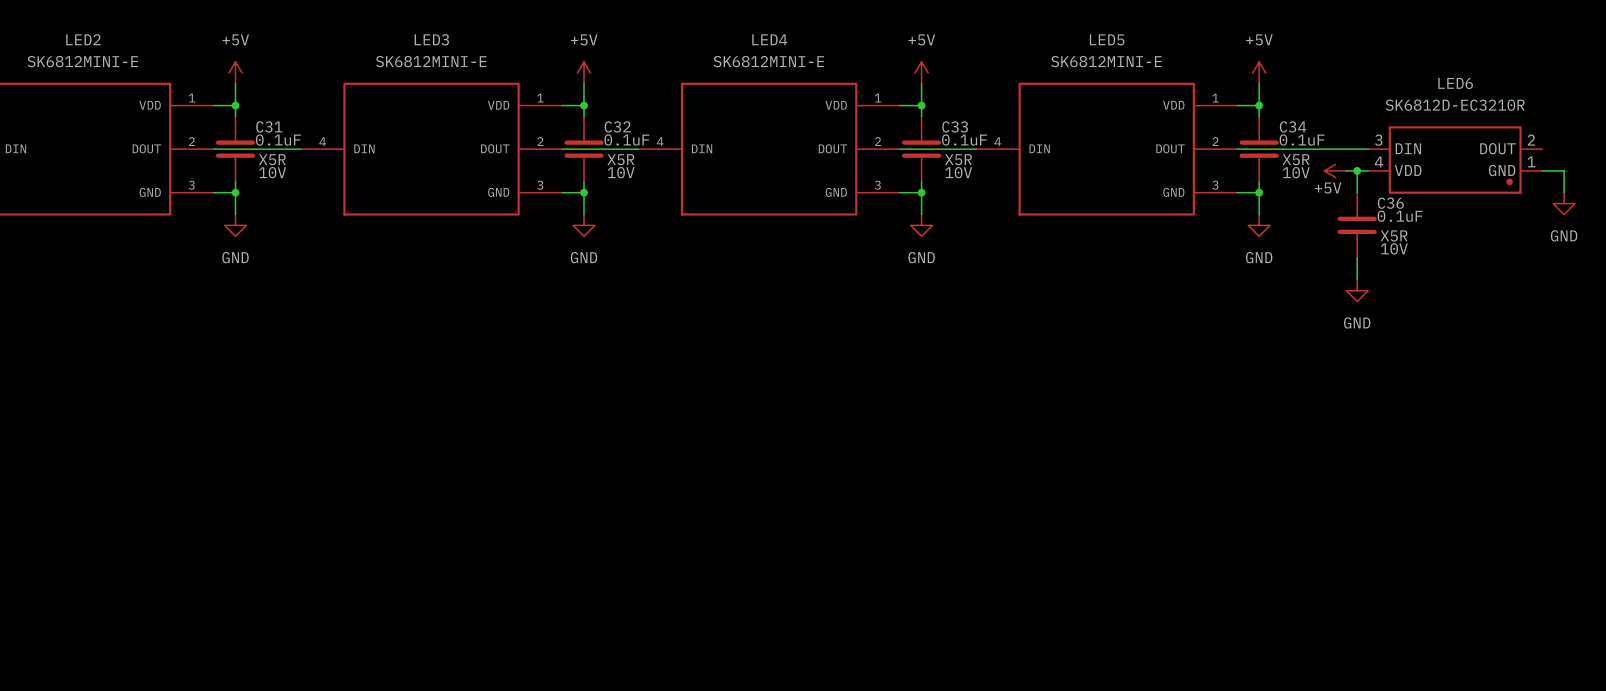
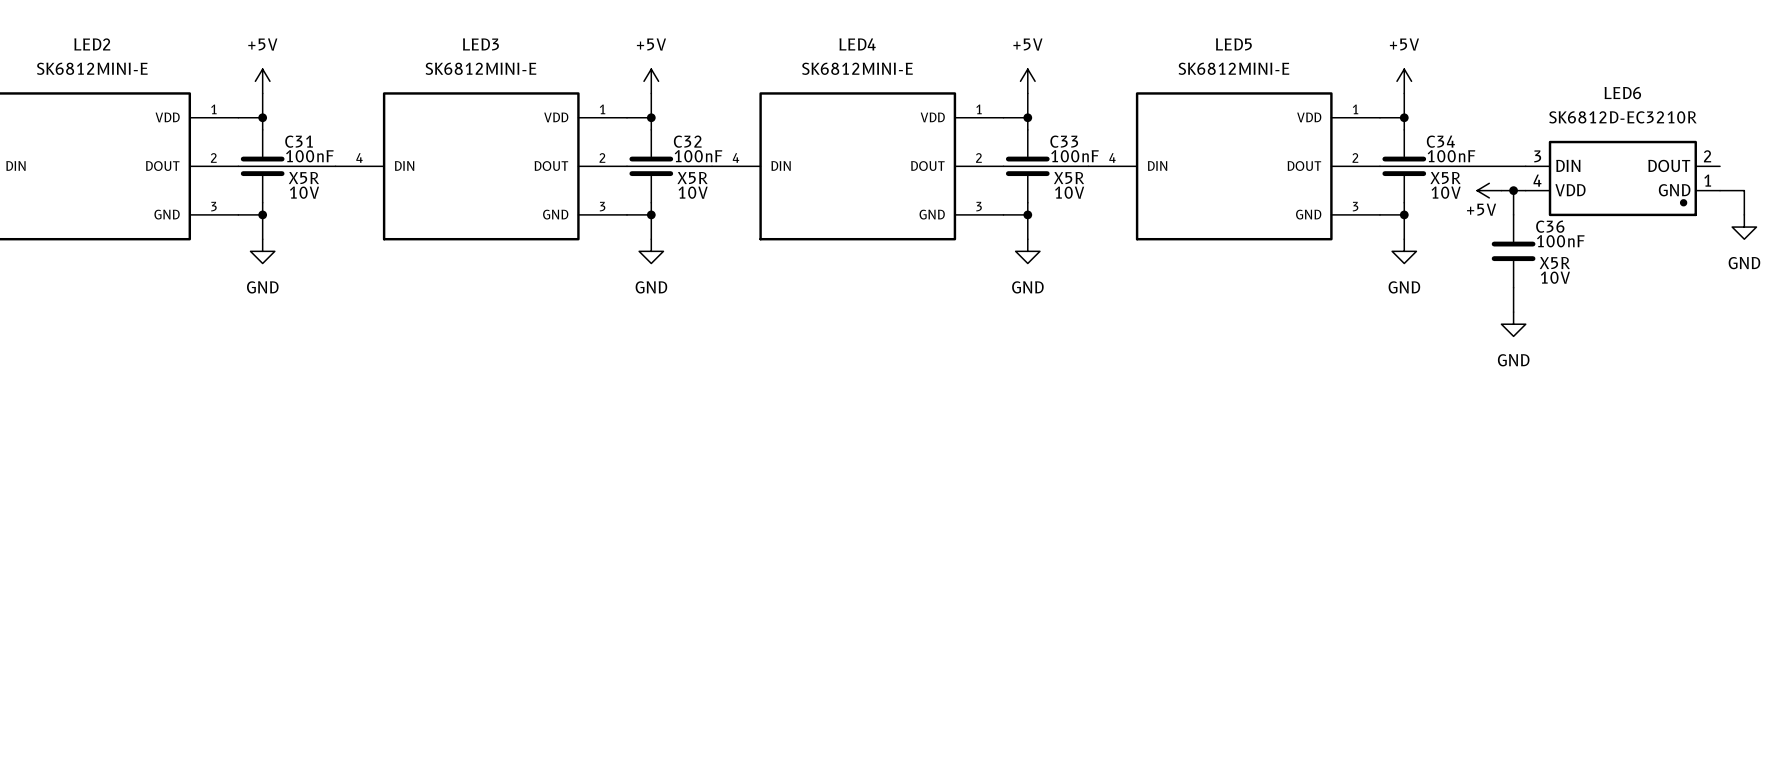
C31 value: 0.1uF (278, 140) -> 100nF (309, 156)
C32 value: 0.1uF (626, 140) -> 100nF (698, 156)
C33 value: 0.1uF (964, 140) -> 100nF (1074, 156)
C34 value: 0.1uF (1302, 140) -> 100nF (1451, 156)
C36 value: 0.1uF (1400, 216) -> 100nF (1560, 241)

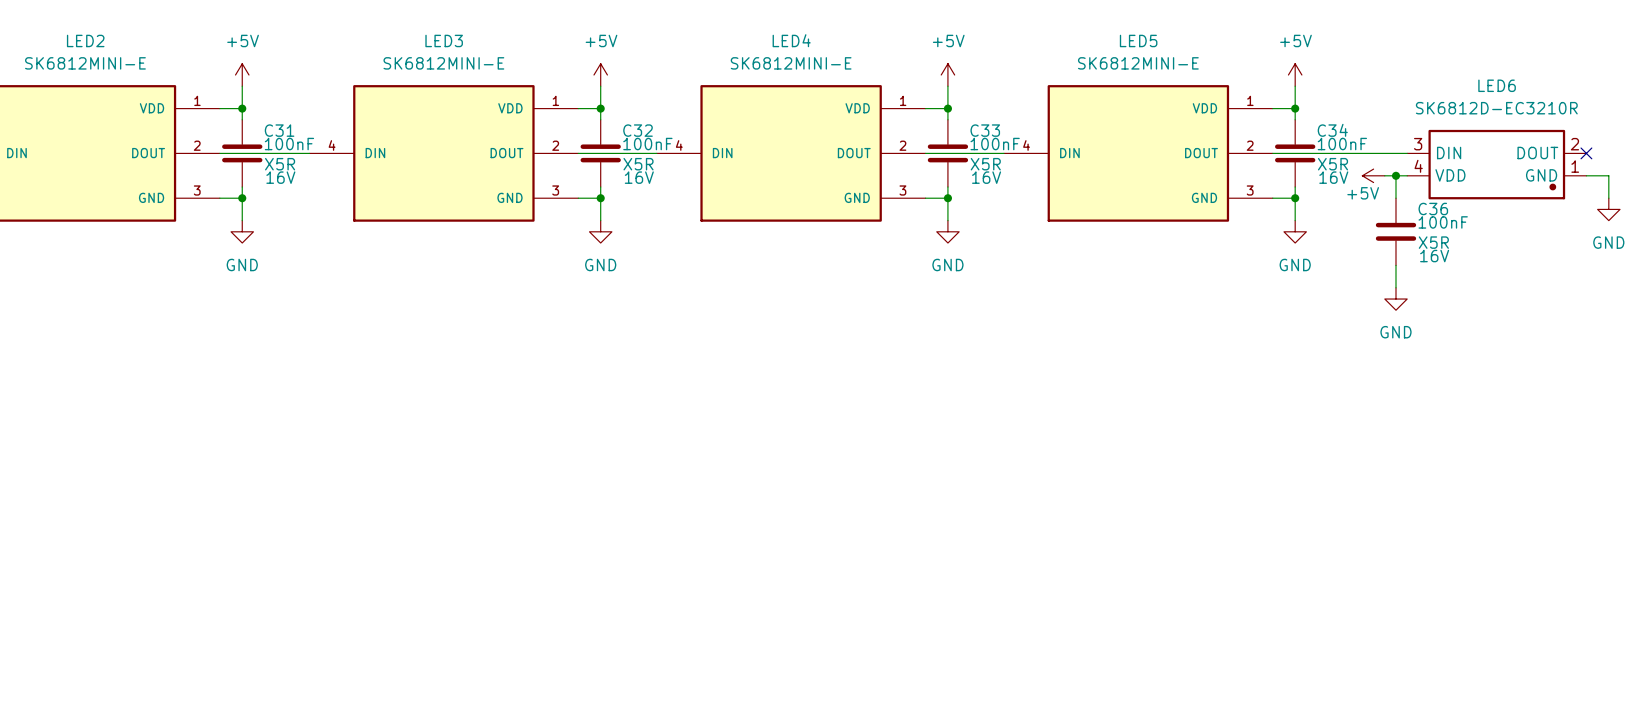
no-connect mark: none -> (1586, 153)
C31 text: 10V (304, 192) -> 16V (280, 177)
C32 text: 10V (693, 192) -> 16V (639, 177)
C33 text: 10V (1069, 192) -> 16V (986, 177)
C34 text: 10V (1446, 192) -> 16V (1333, 177)
C36 text: 10V (1555, 277) -> 16V (1434, 256)

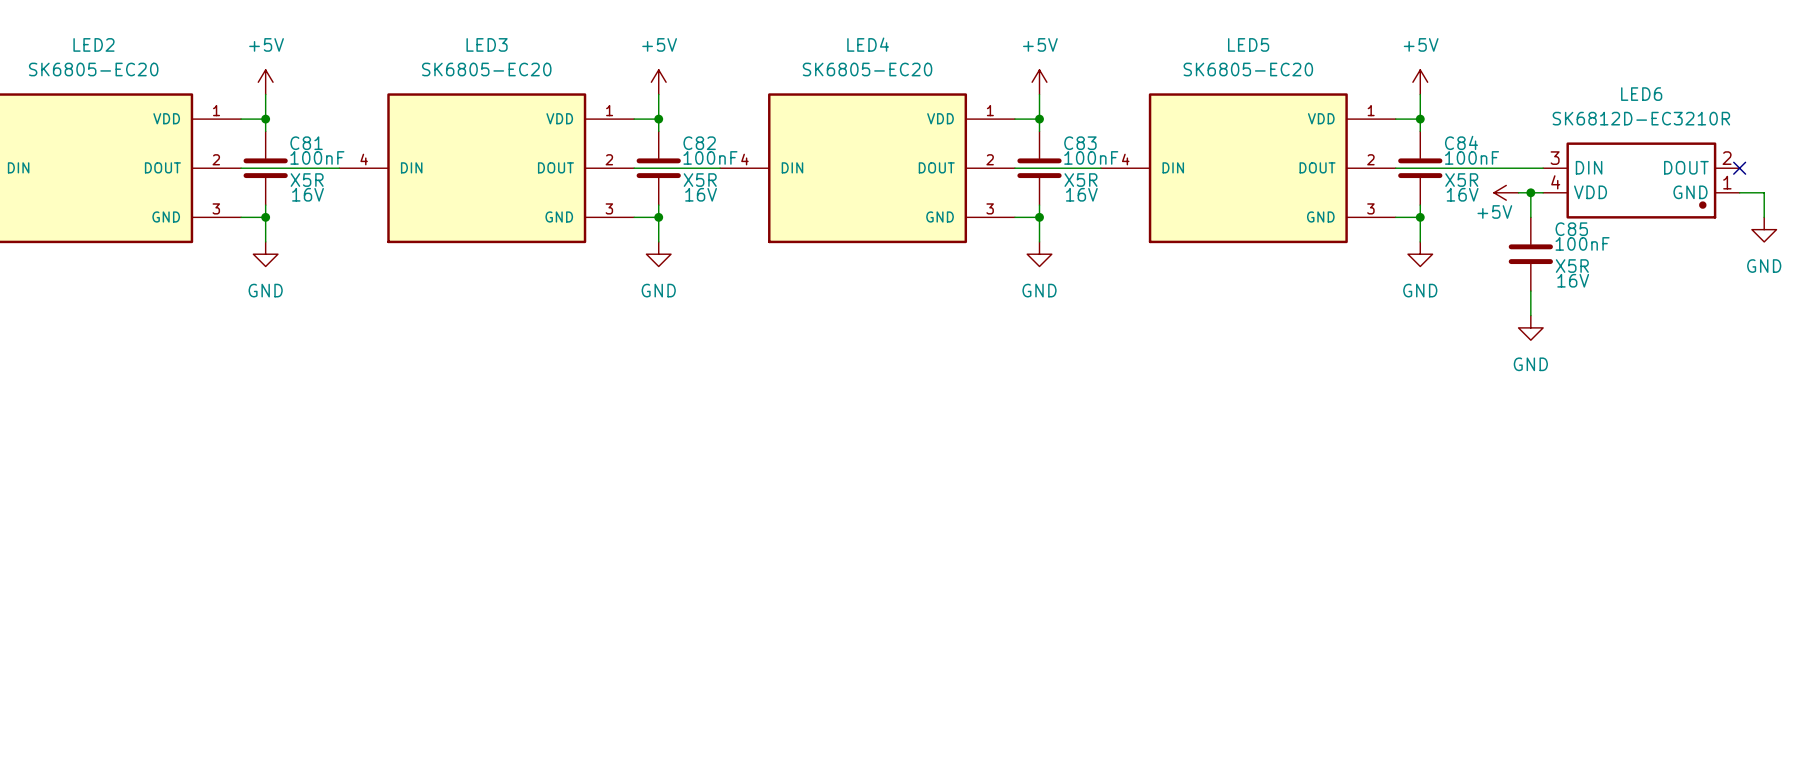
LED2 value: SK6812MINI-E (85, 63) -> SK6805-EC20 (93, 69)
LED3 value: SK6812MINI-E (443, 63) -> SK6805-EC20 (486, 69)
LED4 value: SK6812MINI-E (791, 63) -> SK6805-EC20 (867, 69)
LED5 value: SK6812MINI-E (1138, 63) -> SK6805-EC20 (1248, 69)
C31 name: C31 (279, 130) -> C81 (306, 143)
C32 name: C32 (638, 130) -> C82 (699, 143)
C33 name: C33 (985, 130) -> C83 (1080, 143)
C34 name: C34 (1332, 130) -> C84 (1461, 142)
C36 name: C36 (1433, 208) -> C85 (1571, 229)

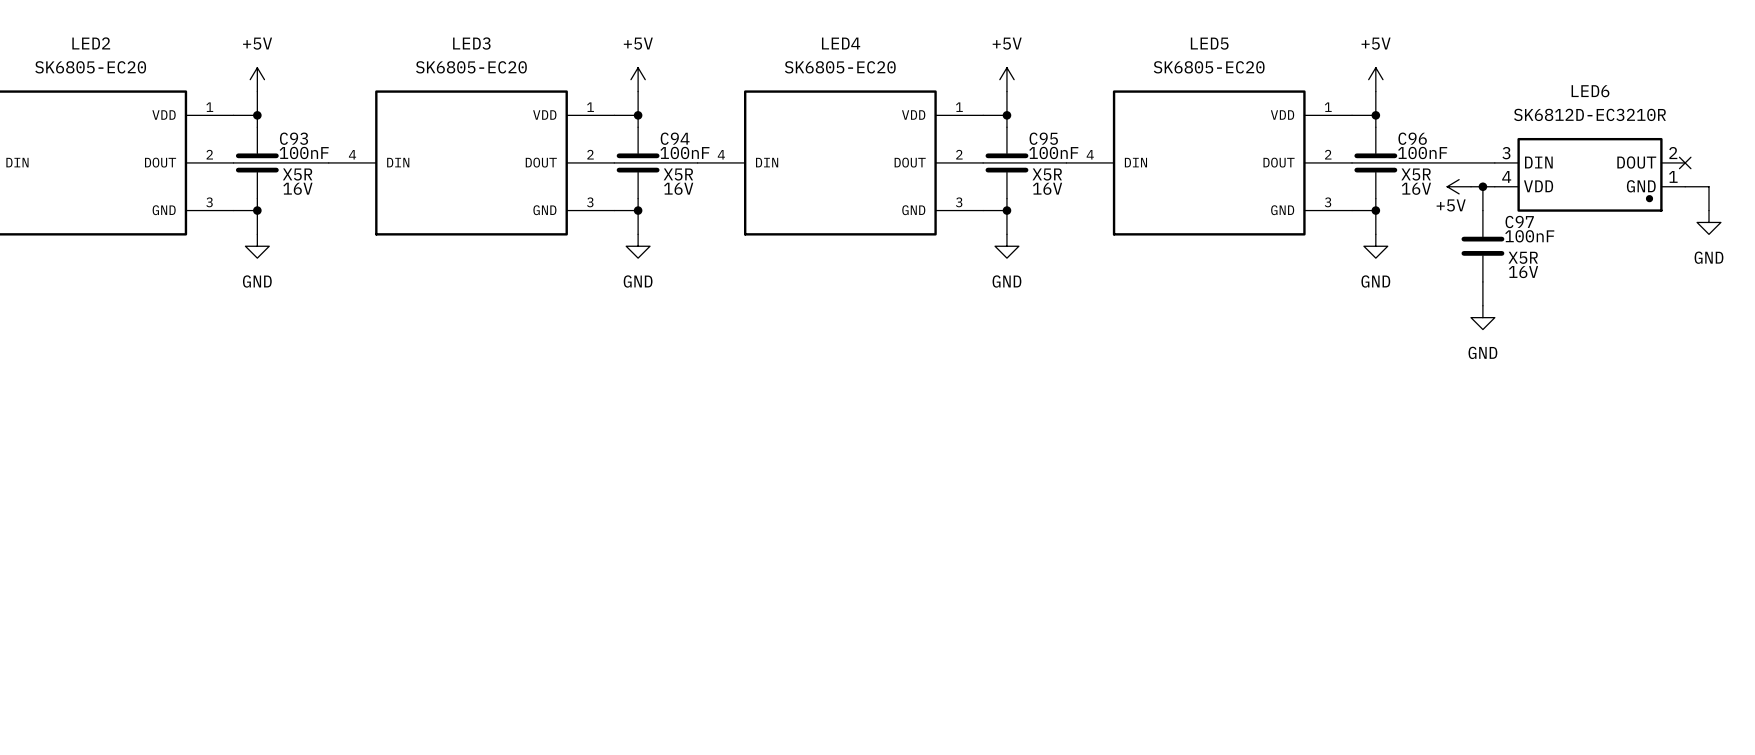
C84 name: C84 (1461, 142) -> C96 (1412, 138)
C81 name: C81 (306, 143) -> C93 (294, 138)
C82 name: C82 (699, 143) -> C94 (675, 138)
C83 name: C83 (1080, 143) -> C95 (1043, 138)
C85 name: C85 (1571, 229) -> C97 (1519, 222)

